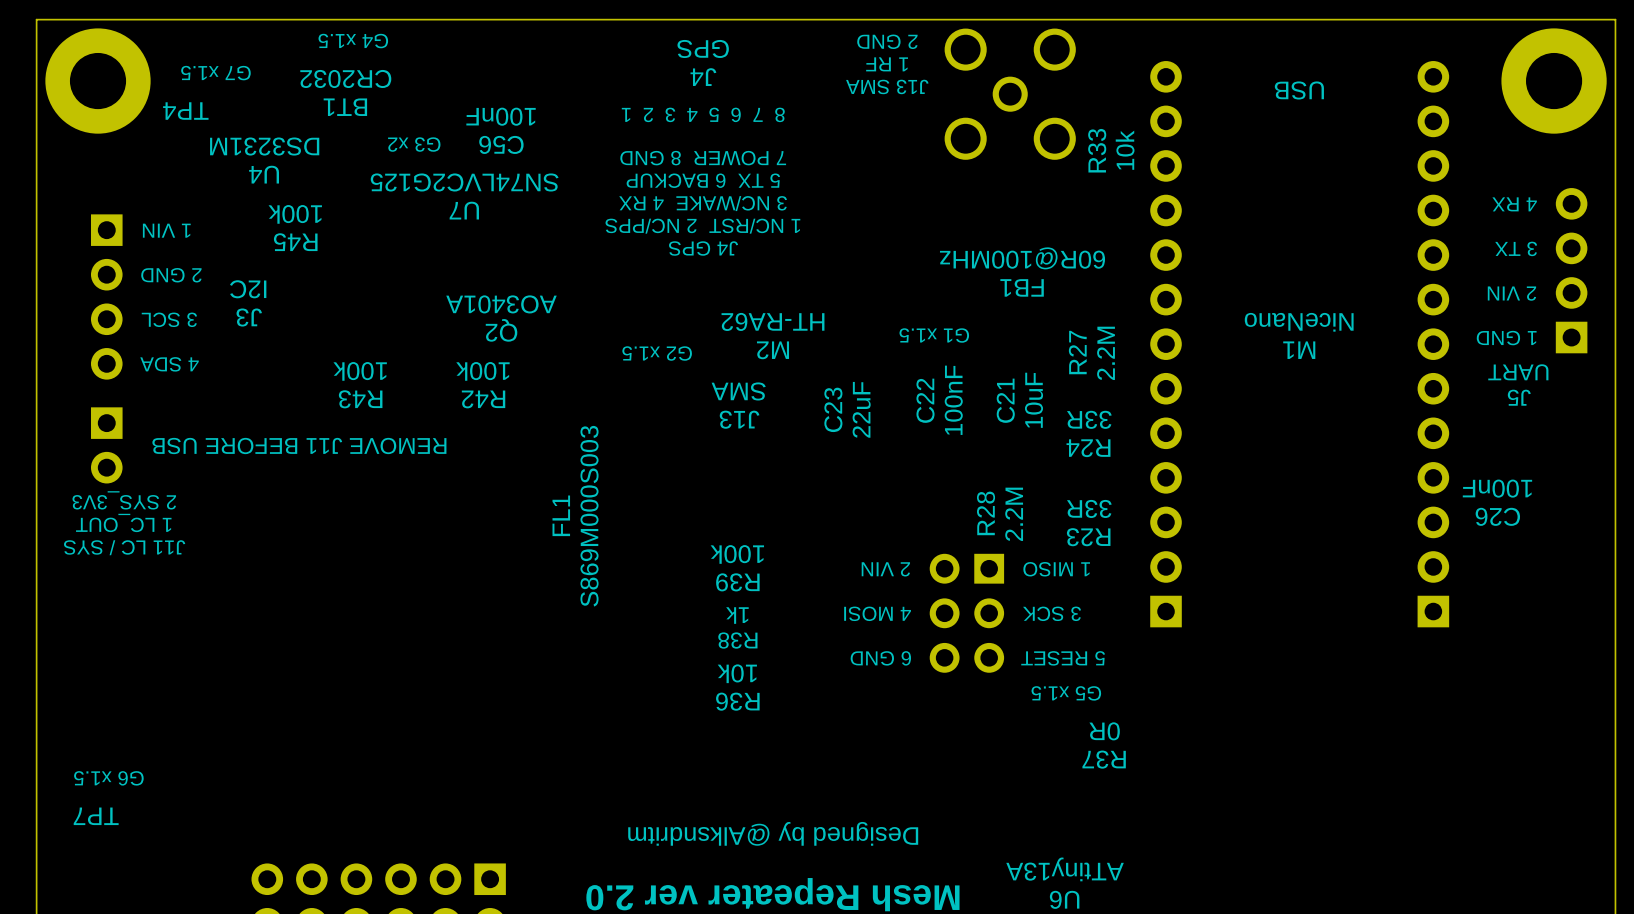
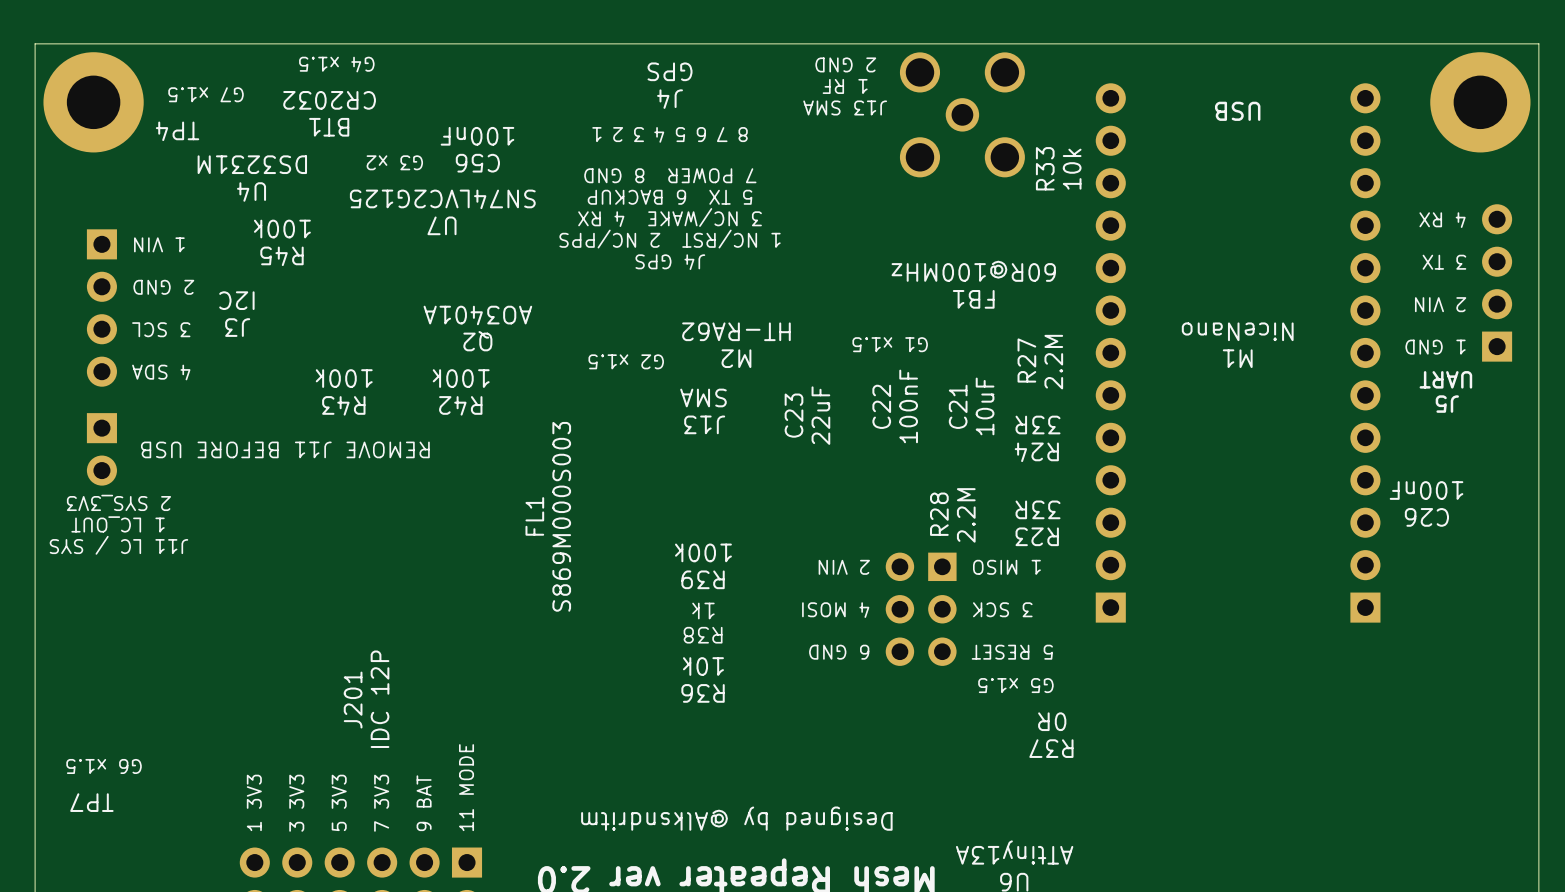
text: none -> IDC 12P (380, 699)
text: none -> J201 (353, 700)
text: none -> 11 MODE (466, 787)
text: none -> 1 3V3 (254, 802)
text: none -> 3 3V3 (296, 803)
text: none -> 5 3V3 (339, 802)
text: none -> 7 3V3 (381, 803)
text: none -> 9 BAT (424, 803)

